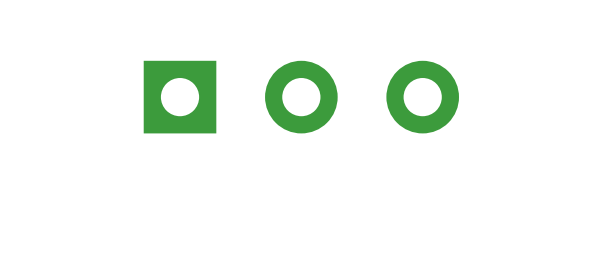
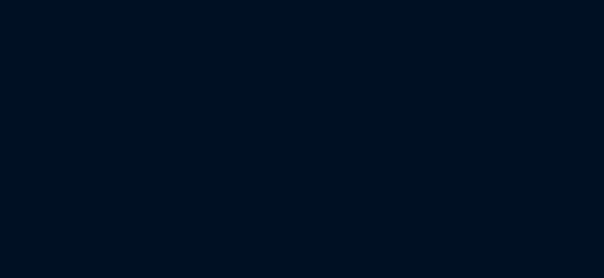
part: (301, 97) -> none

